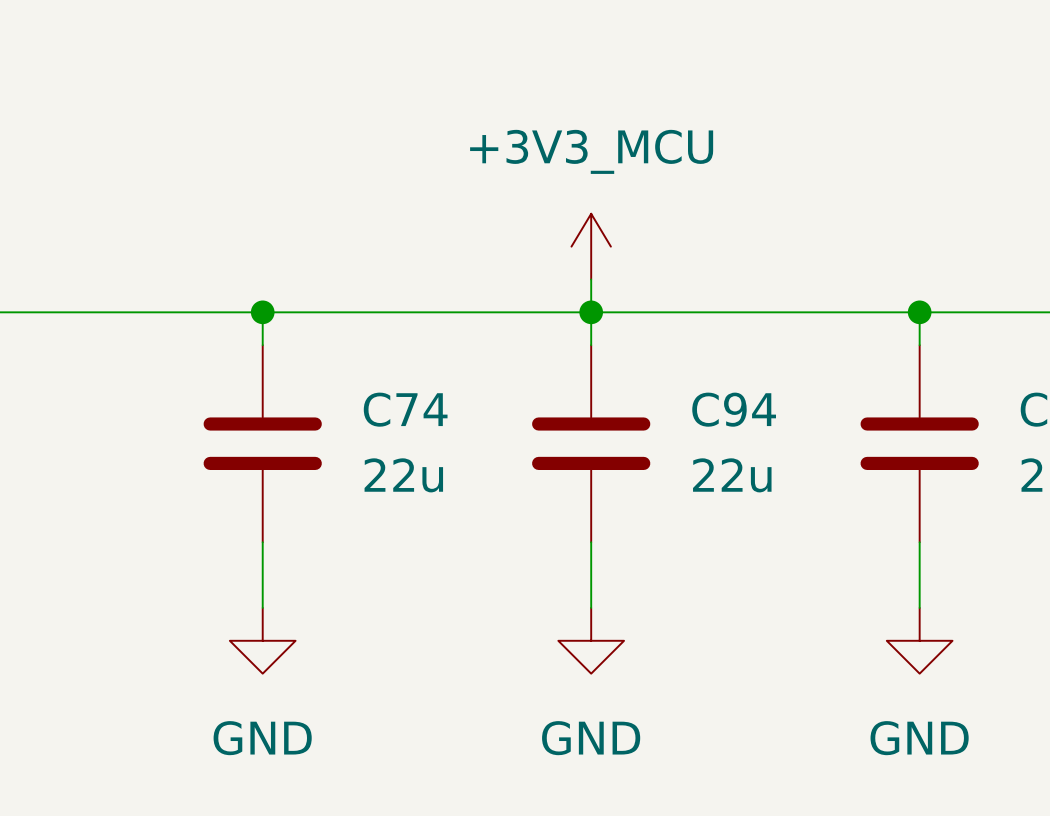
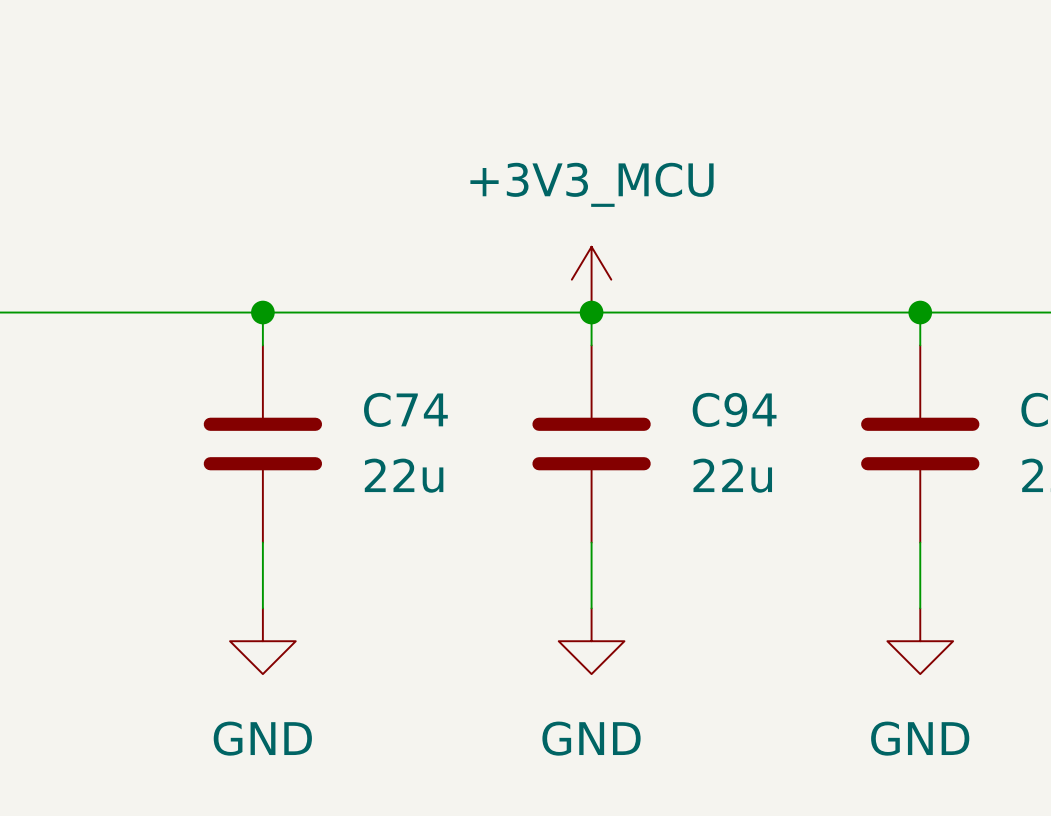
power symbol position: +3V3_MCU (591, 246) -> +3V3_MCU (591, 279)

